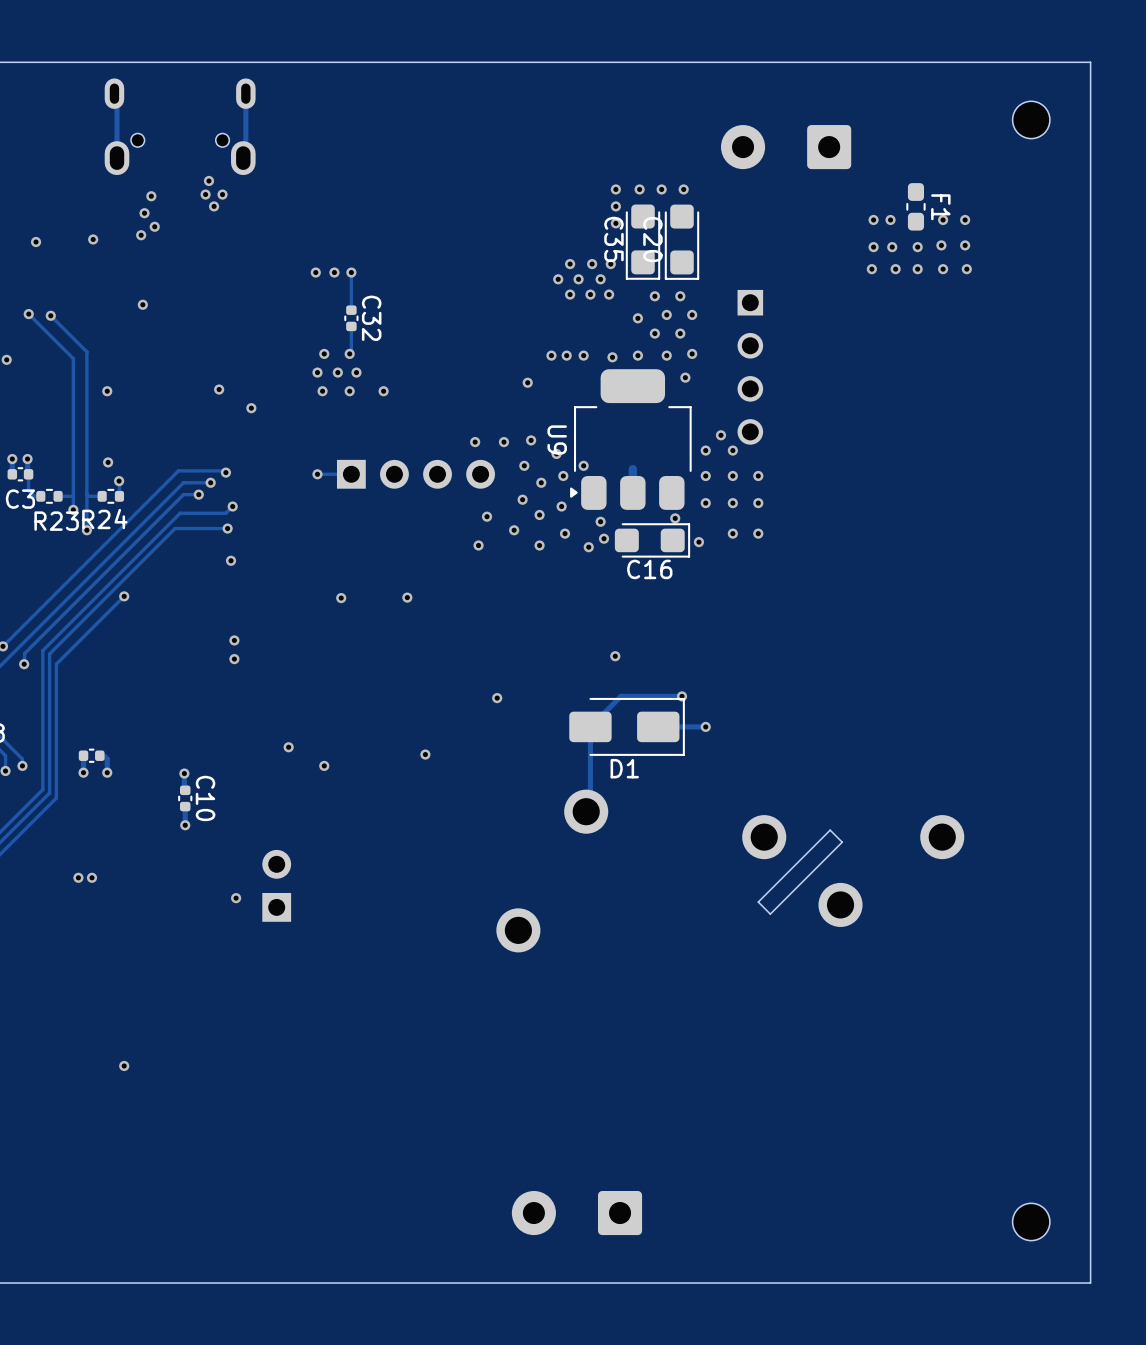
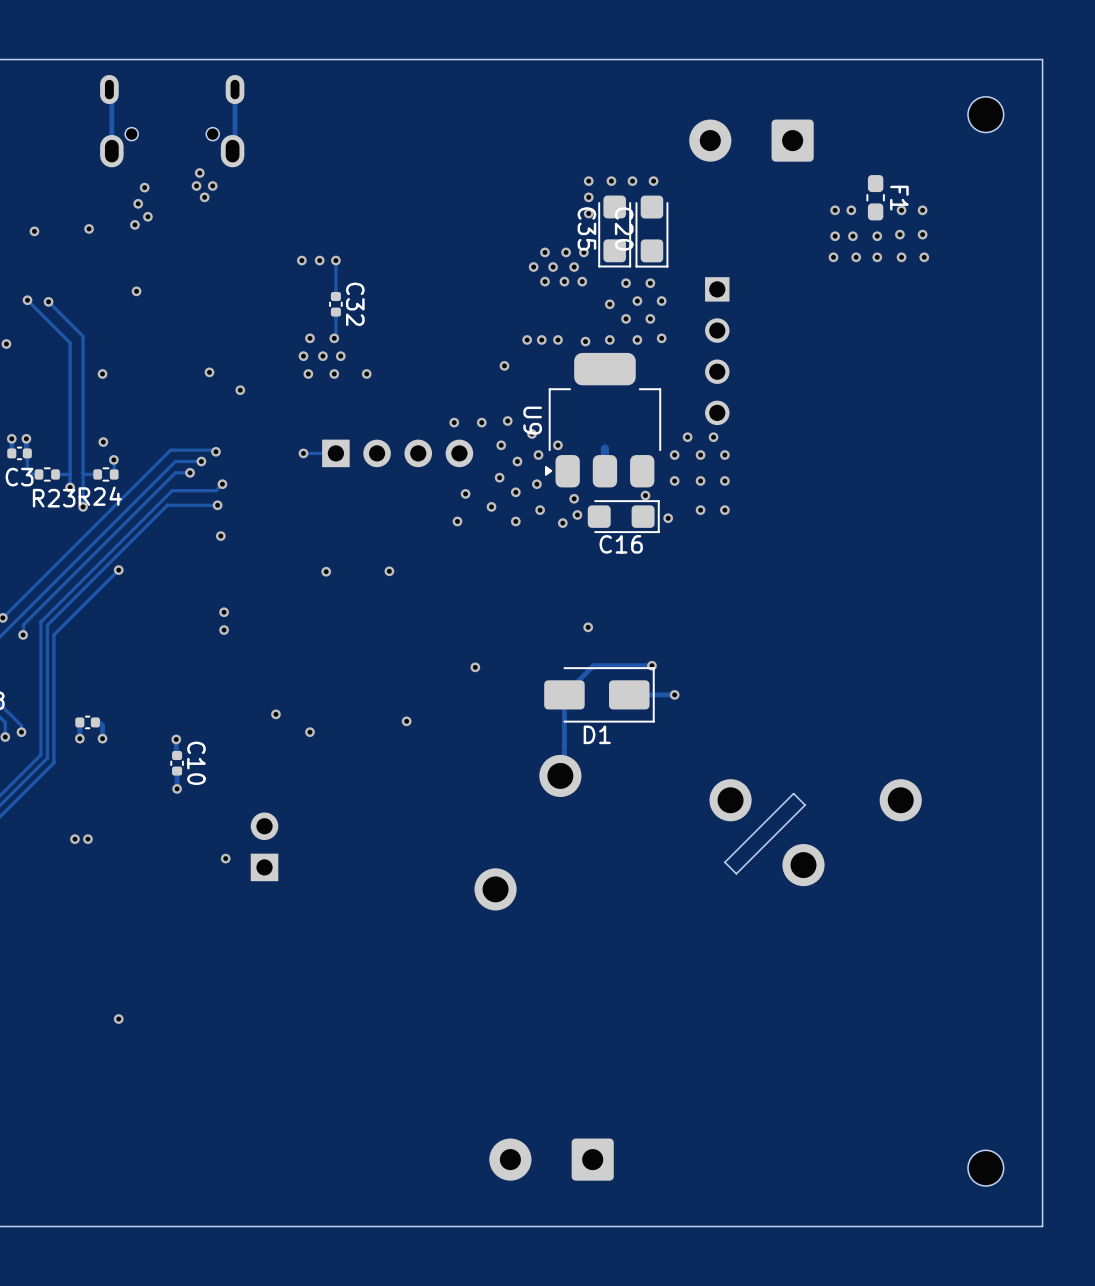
via: (685, 377) -> none
via: (720, 435) -> none
via: (705, 450) -> none
via: (732, 450) -> none
via: none -> (687, 437)
via: none -> (713, 437)

